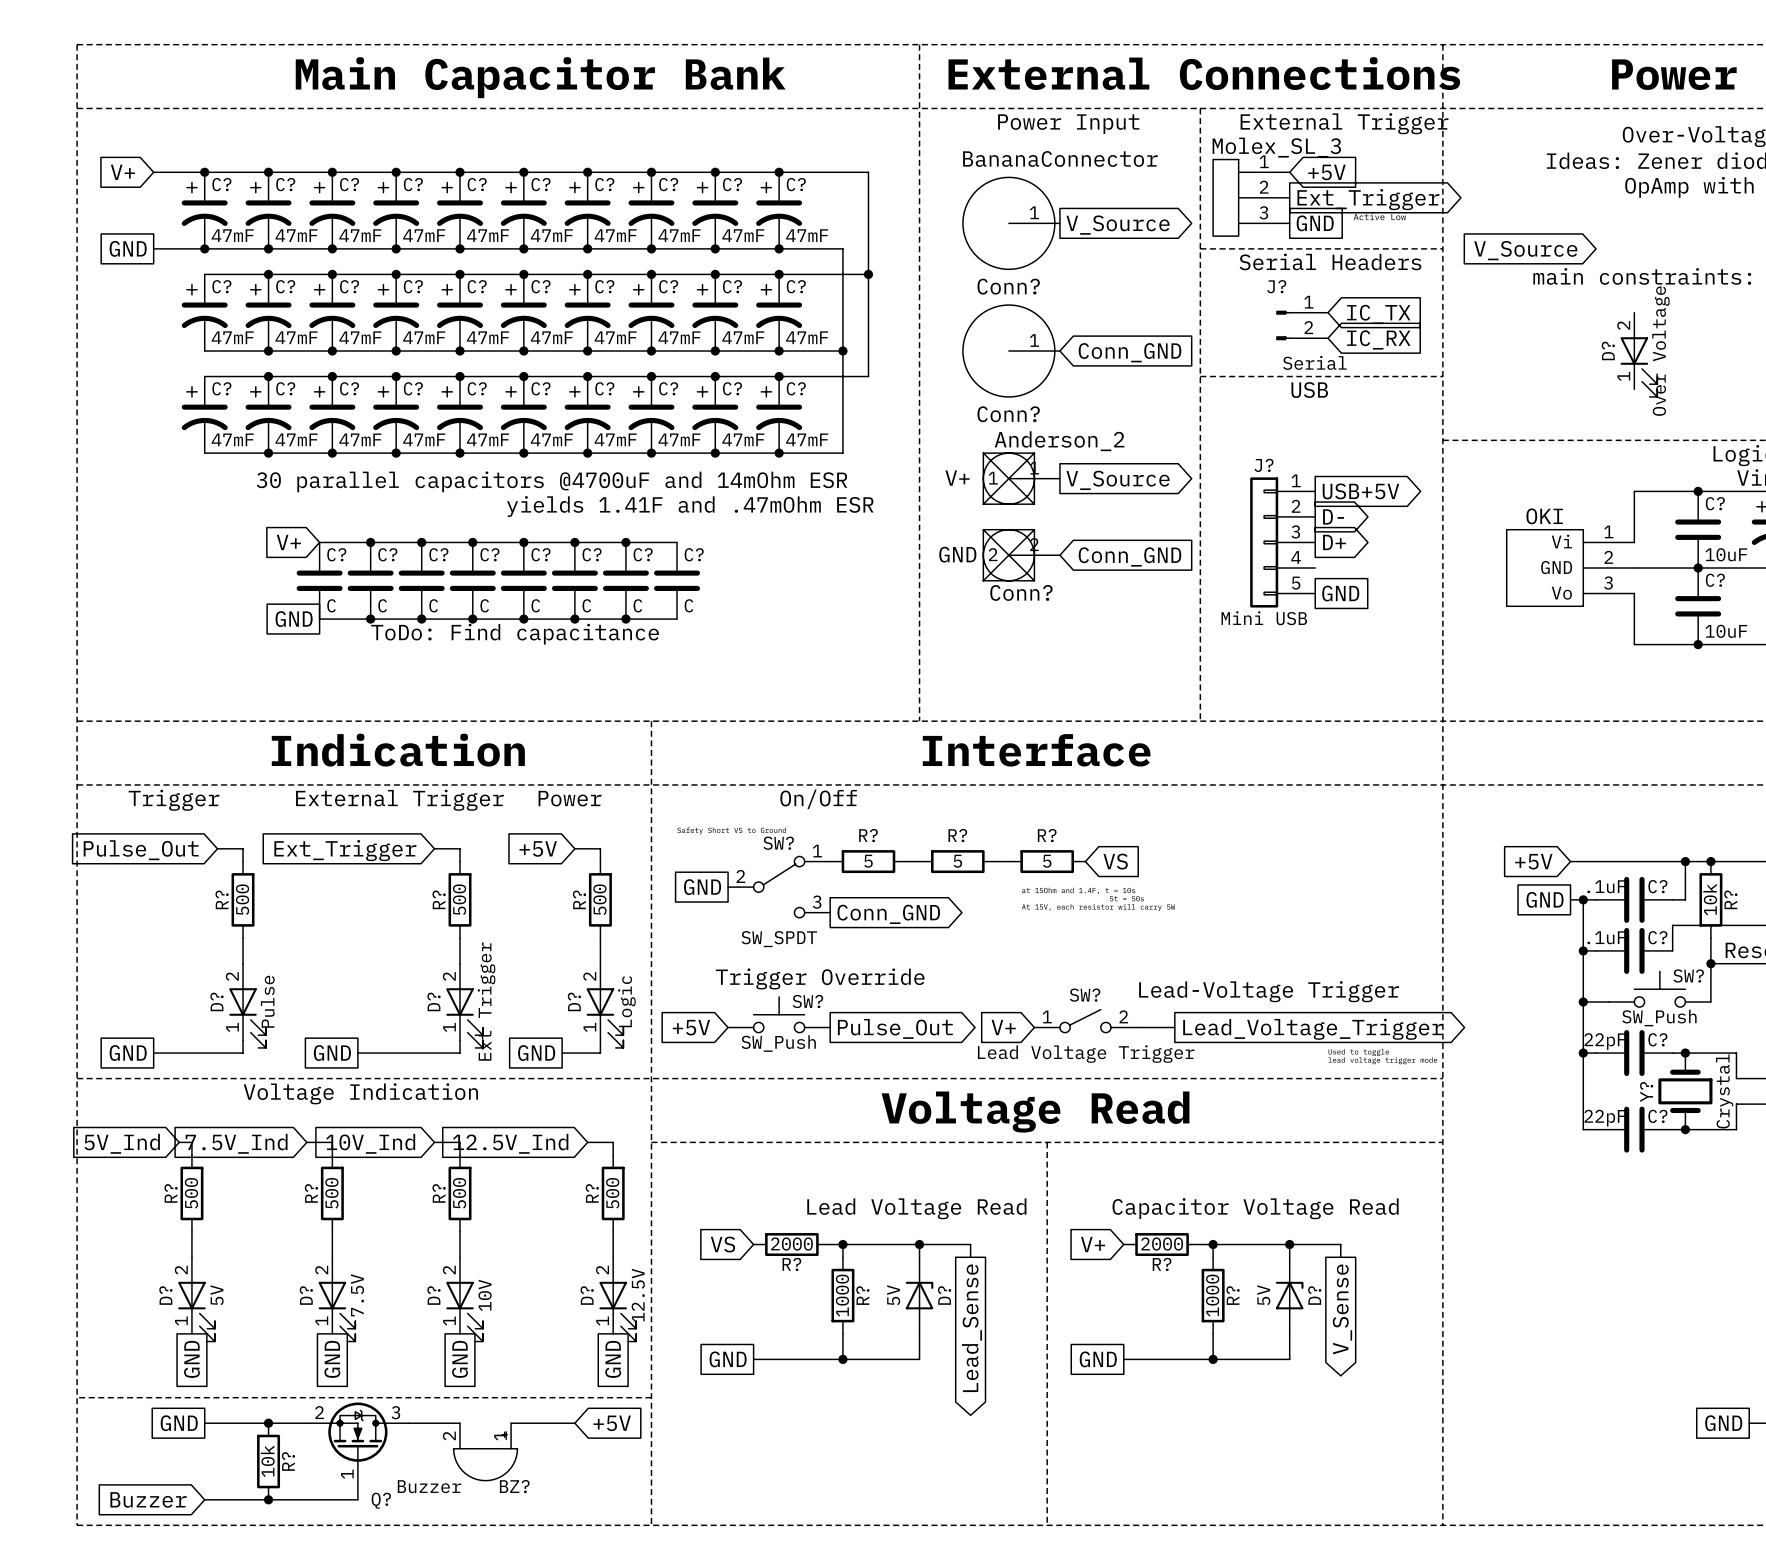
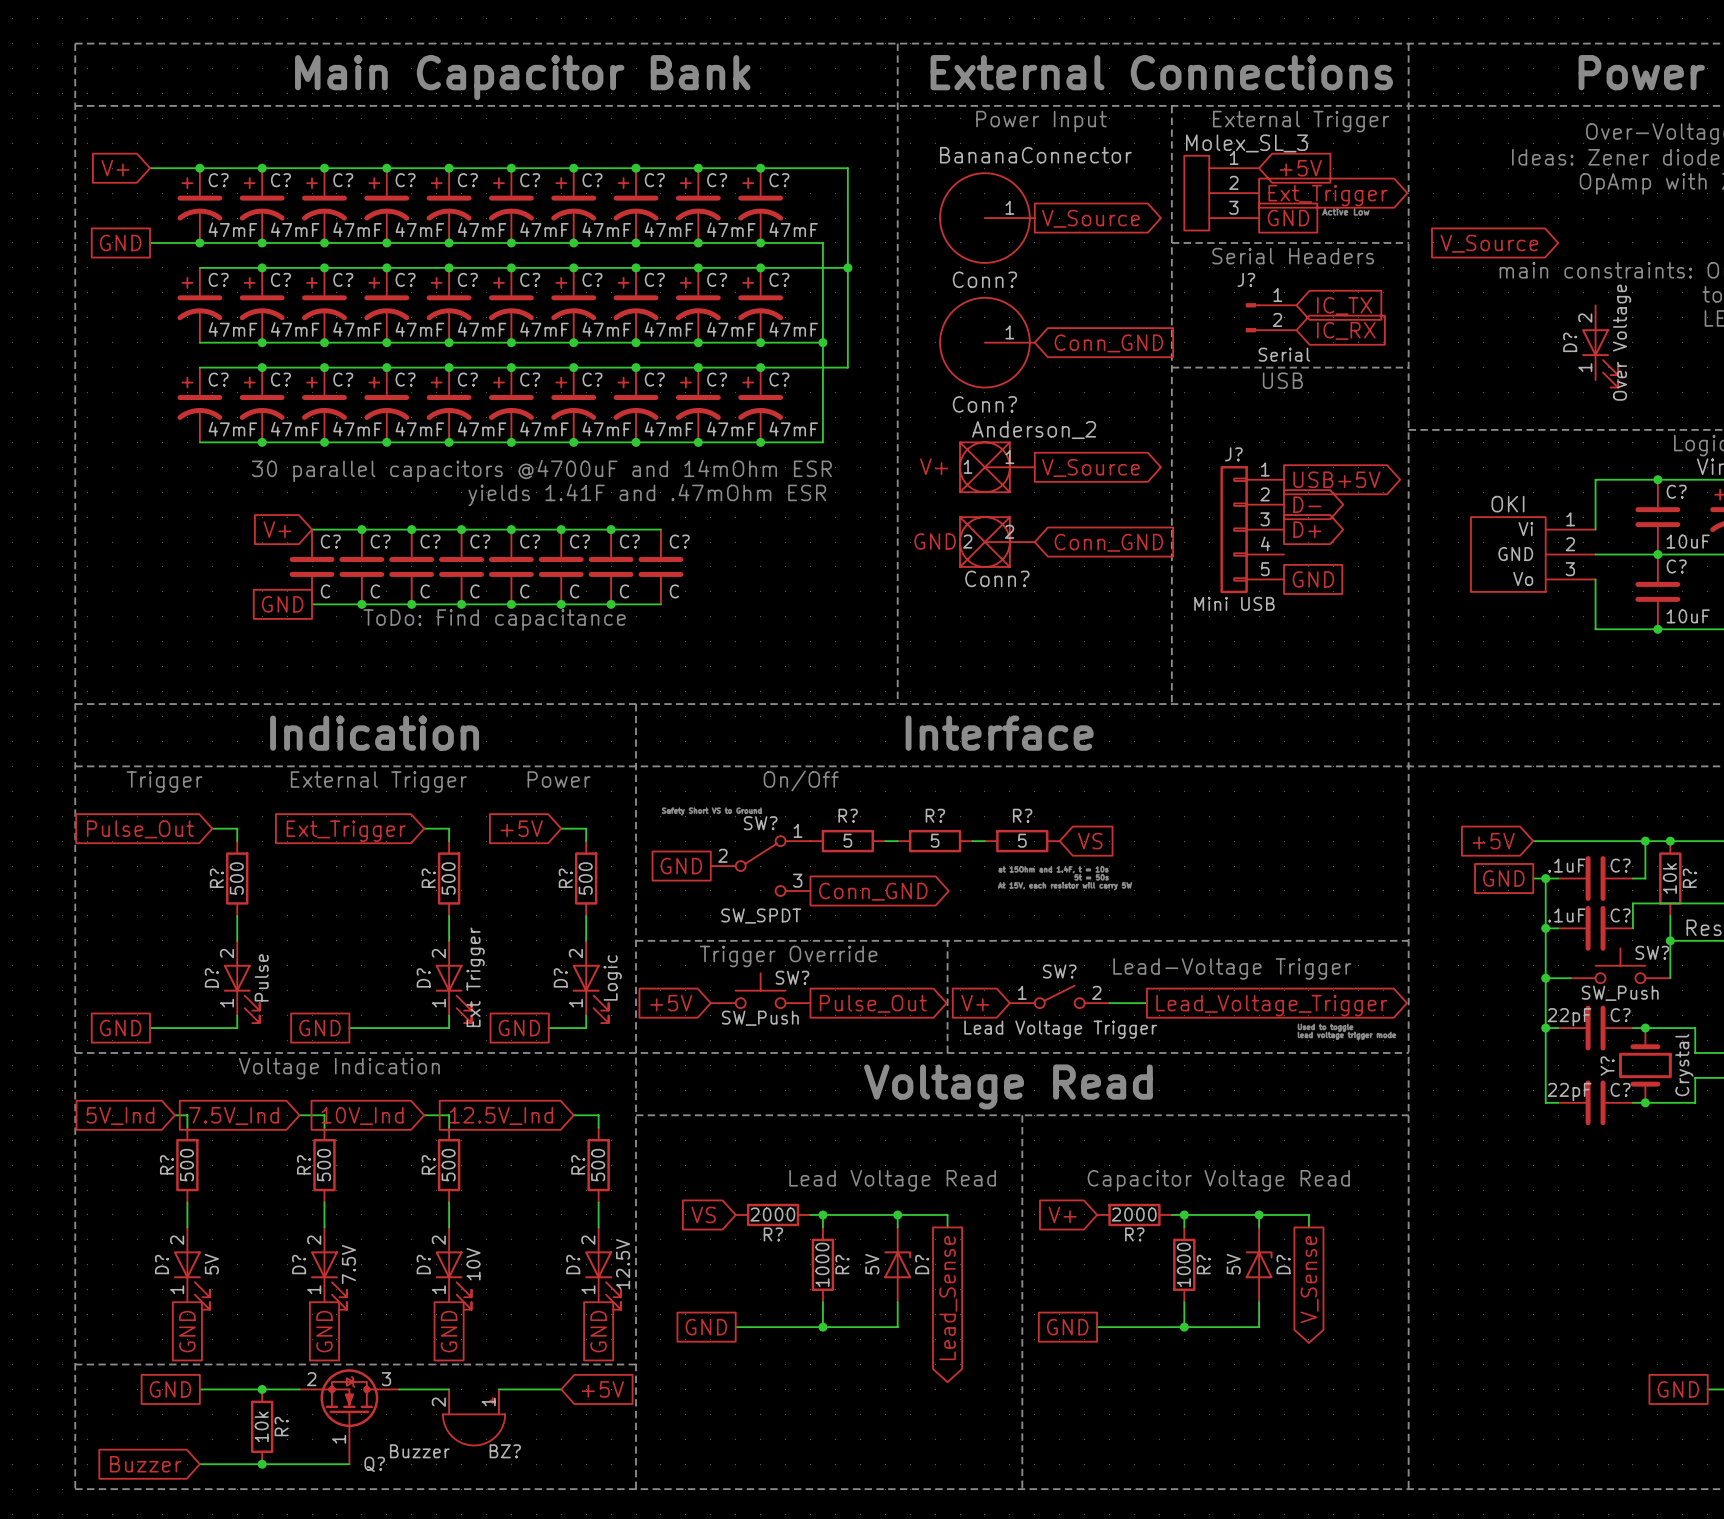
line: none -> (636, 940) (1408, 940)
line: none -> (947, 940) (947, 1052)

